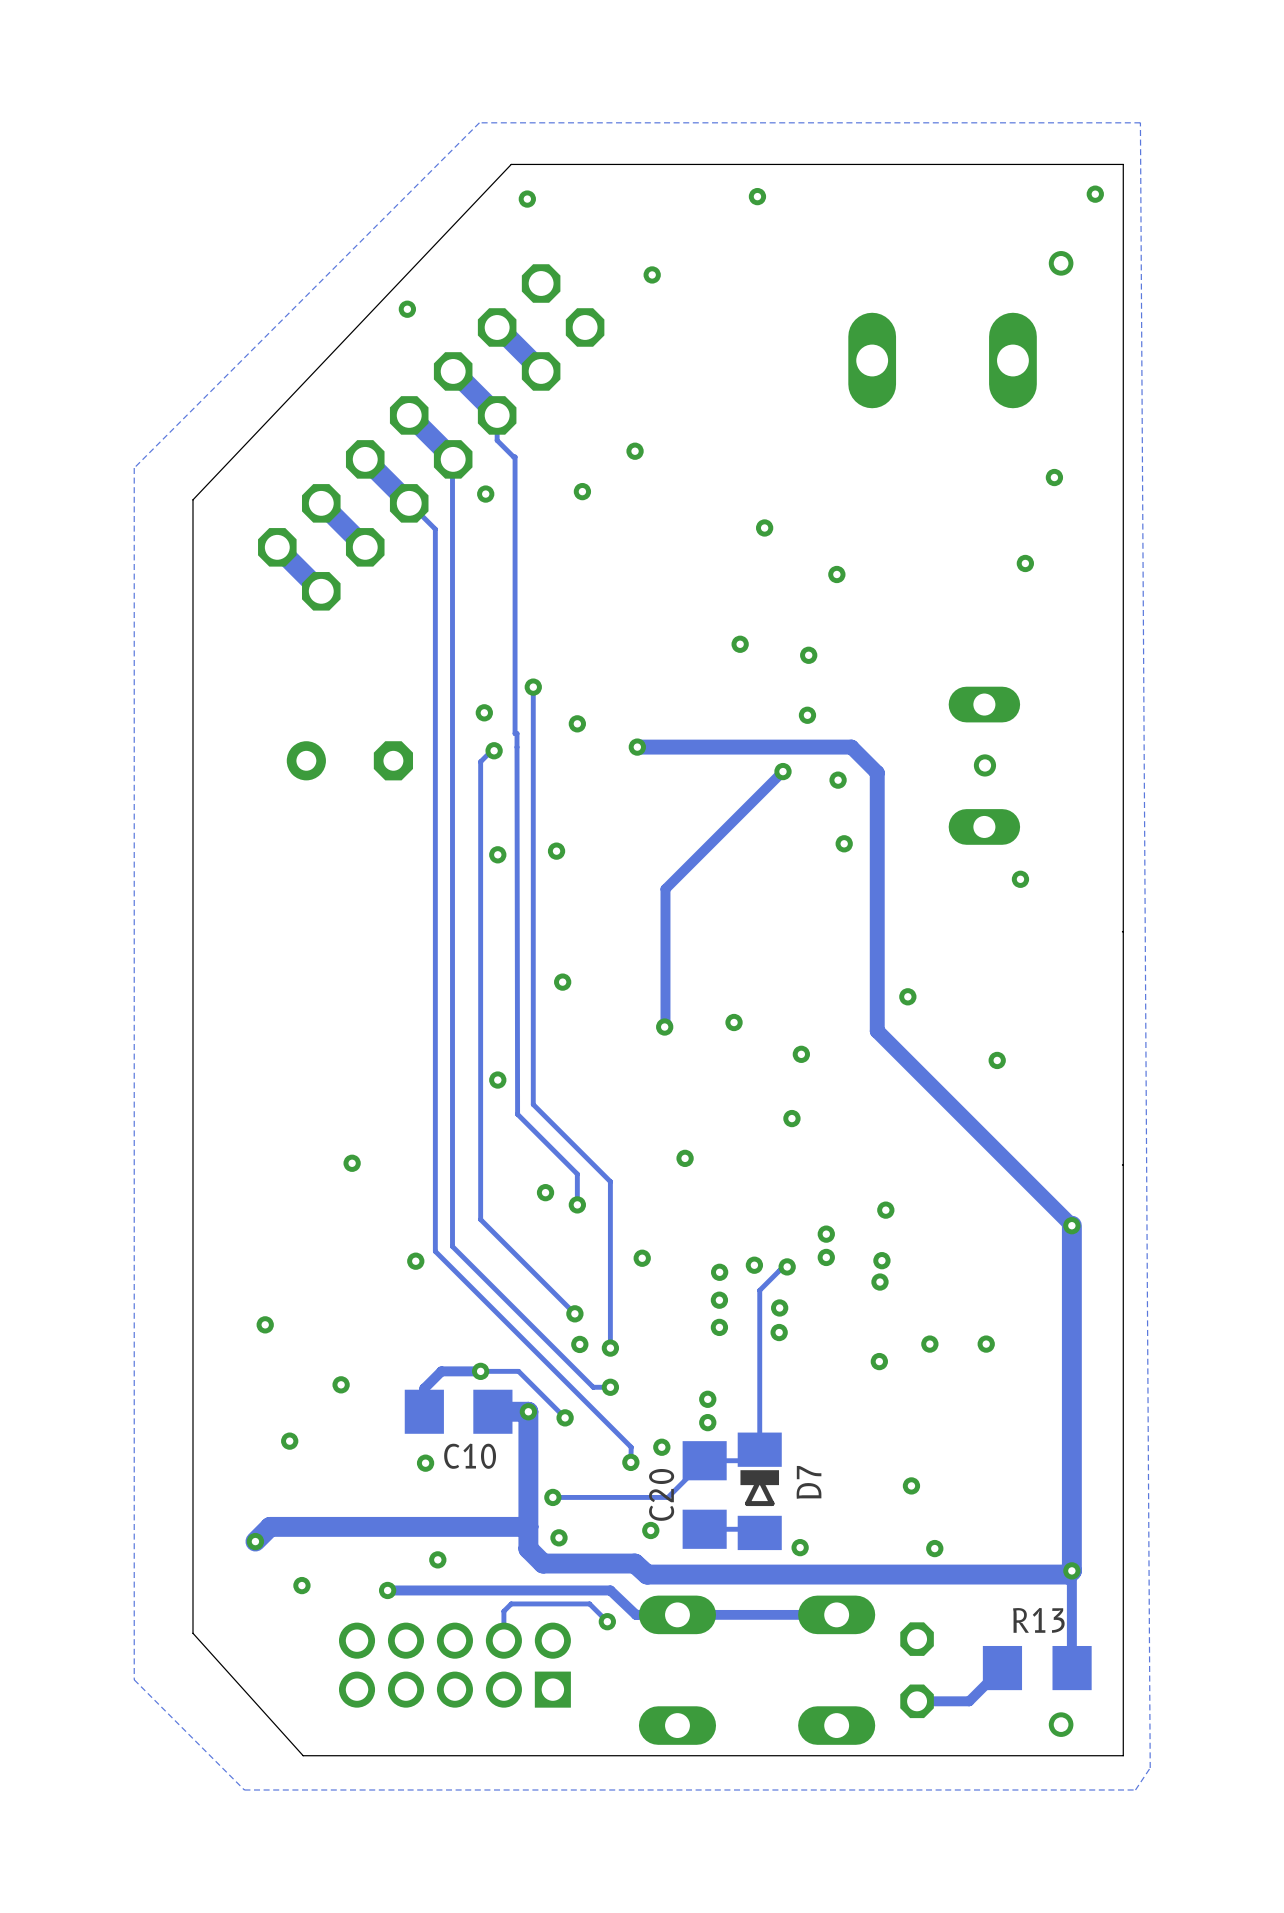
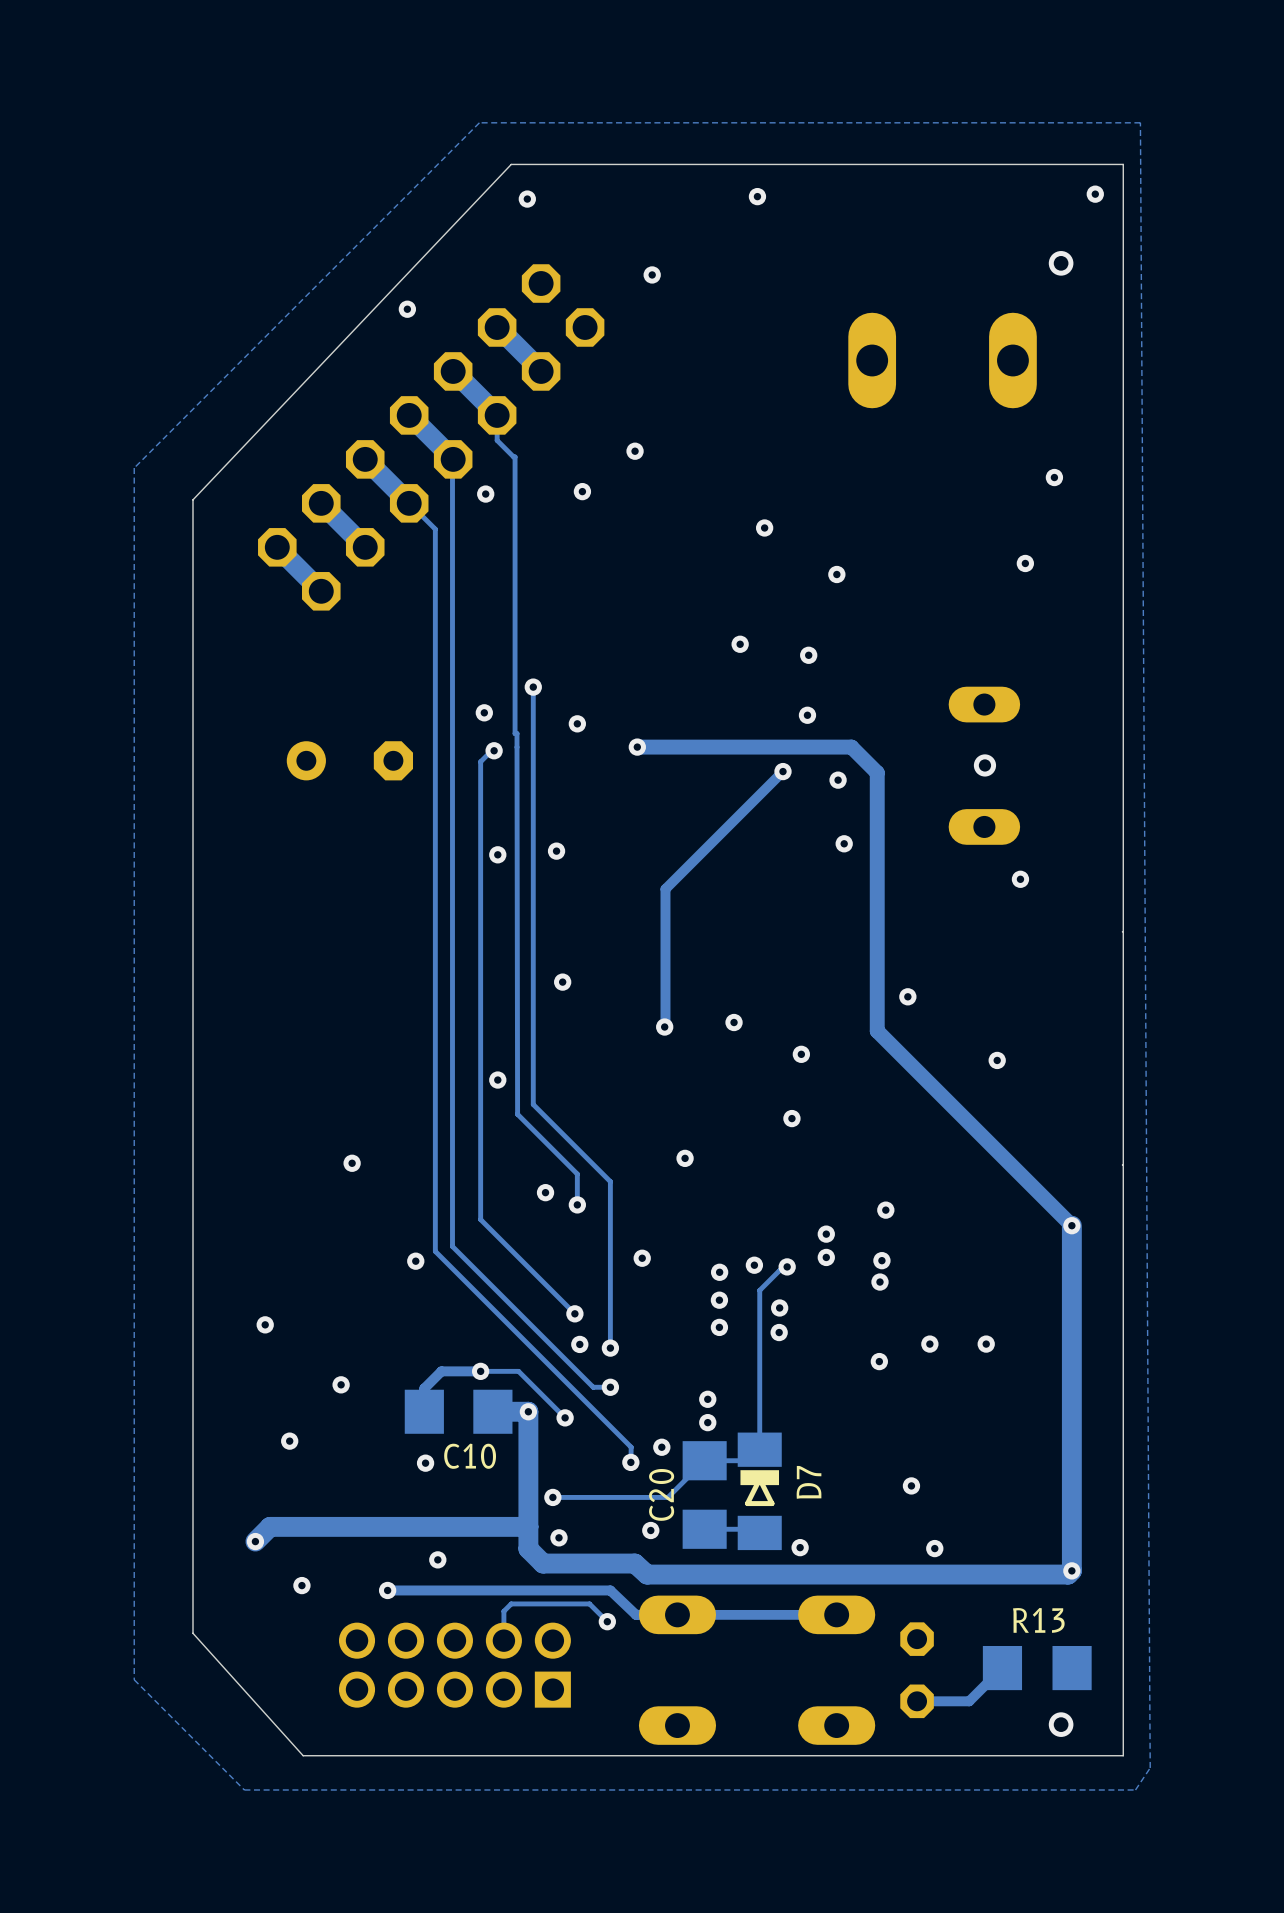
track: (1071, 1570) (1071, 1668) -> none

